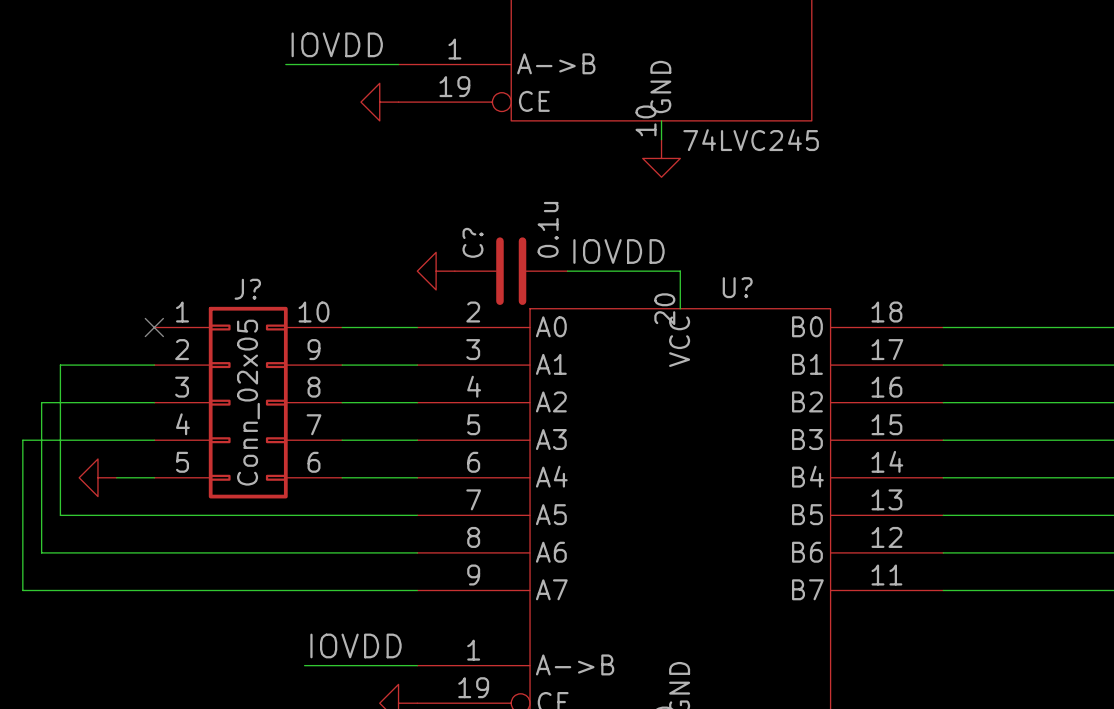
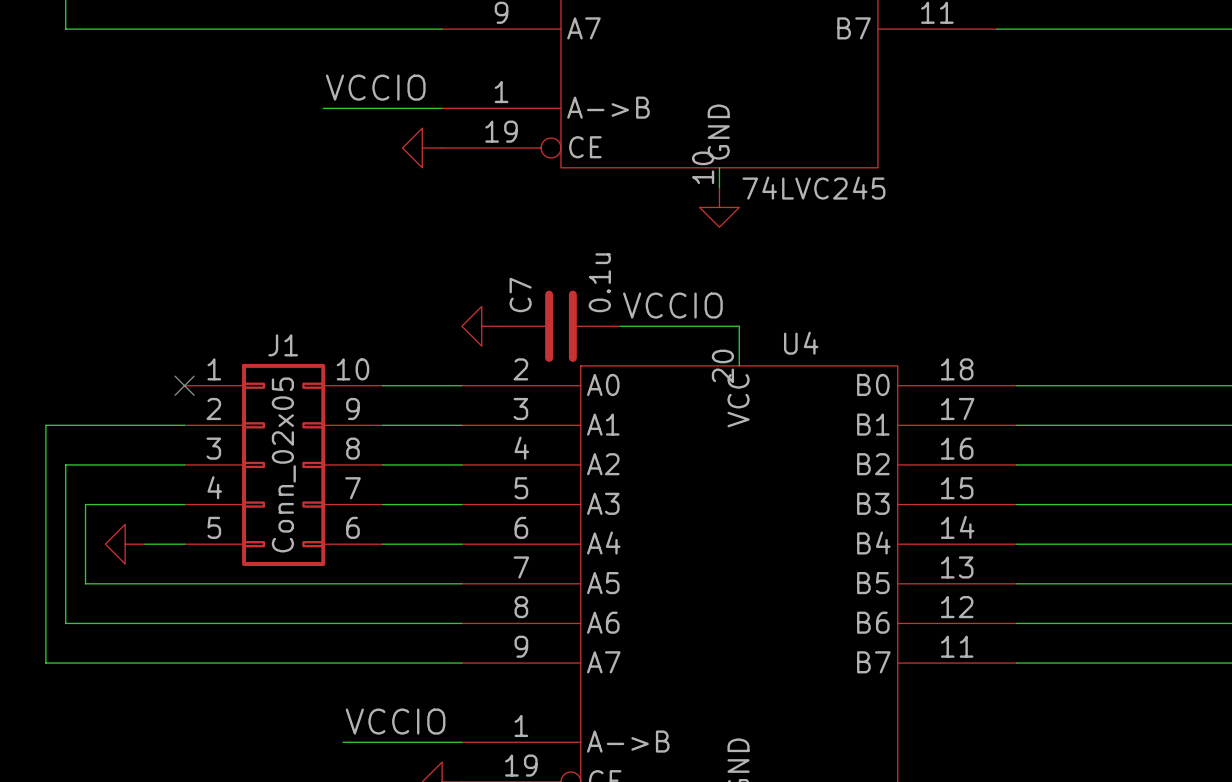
label: IOVDD (337, 44) -> VCCIO (375, 87)
C? name: C? (472, 242) -> C7 (520, 295)
label: IOVDD (618, 251) -> VCCIO (672, 305)
U? name: U? (737, 287) -> U4 (801, 343)
J? name: J? (247, 289) -> J1 (283, 345)
wire: (60, 365) (60, 440) (22, 440) -> (85, 425) (45, 425) (45, 504)
label: IOVDD (356, 645) -> VCCIO (395, 721)

